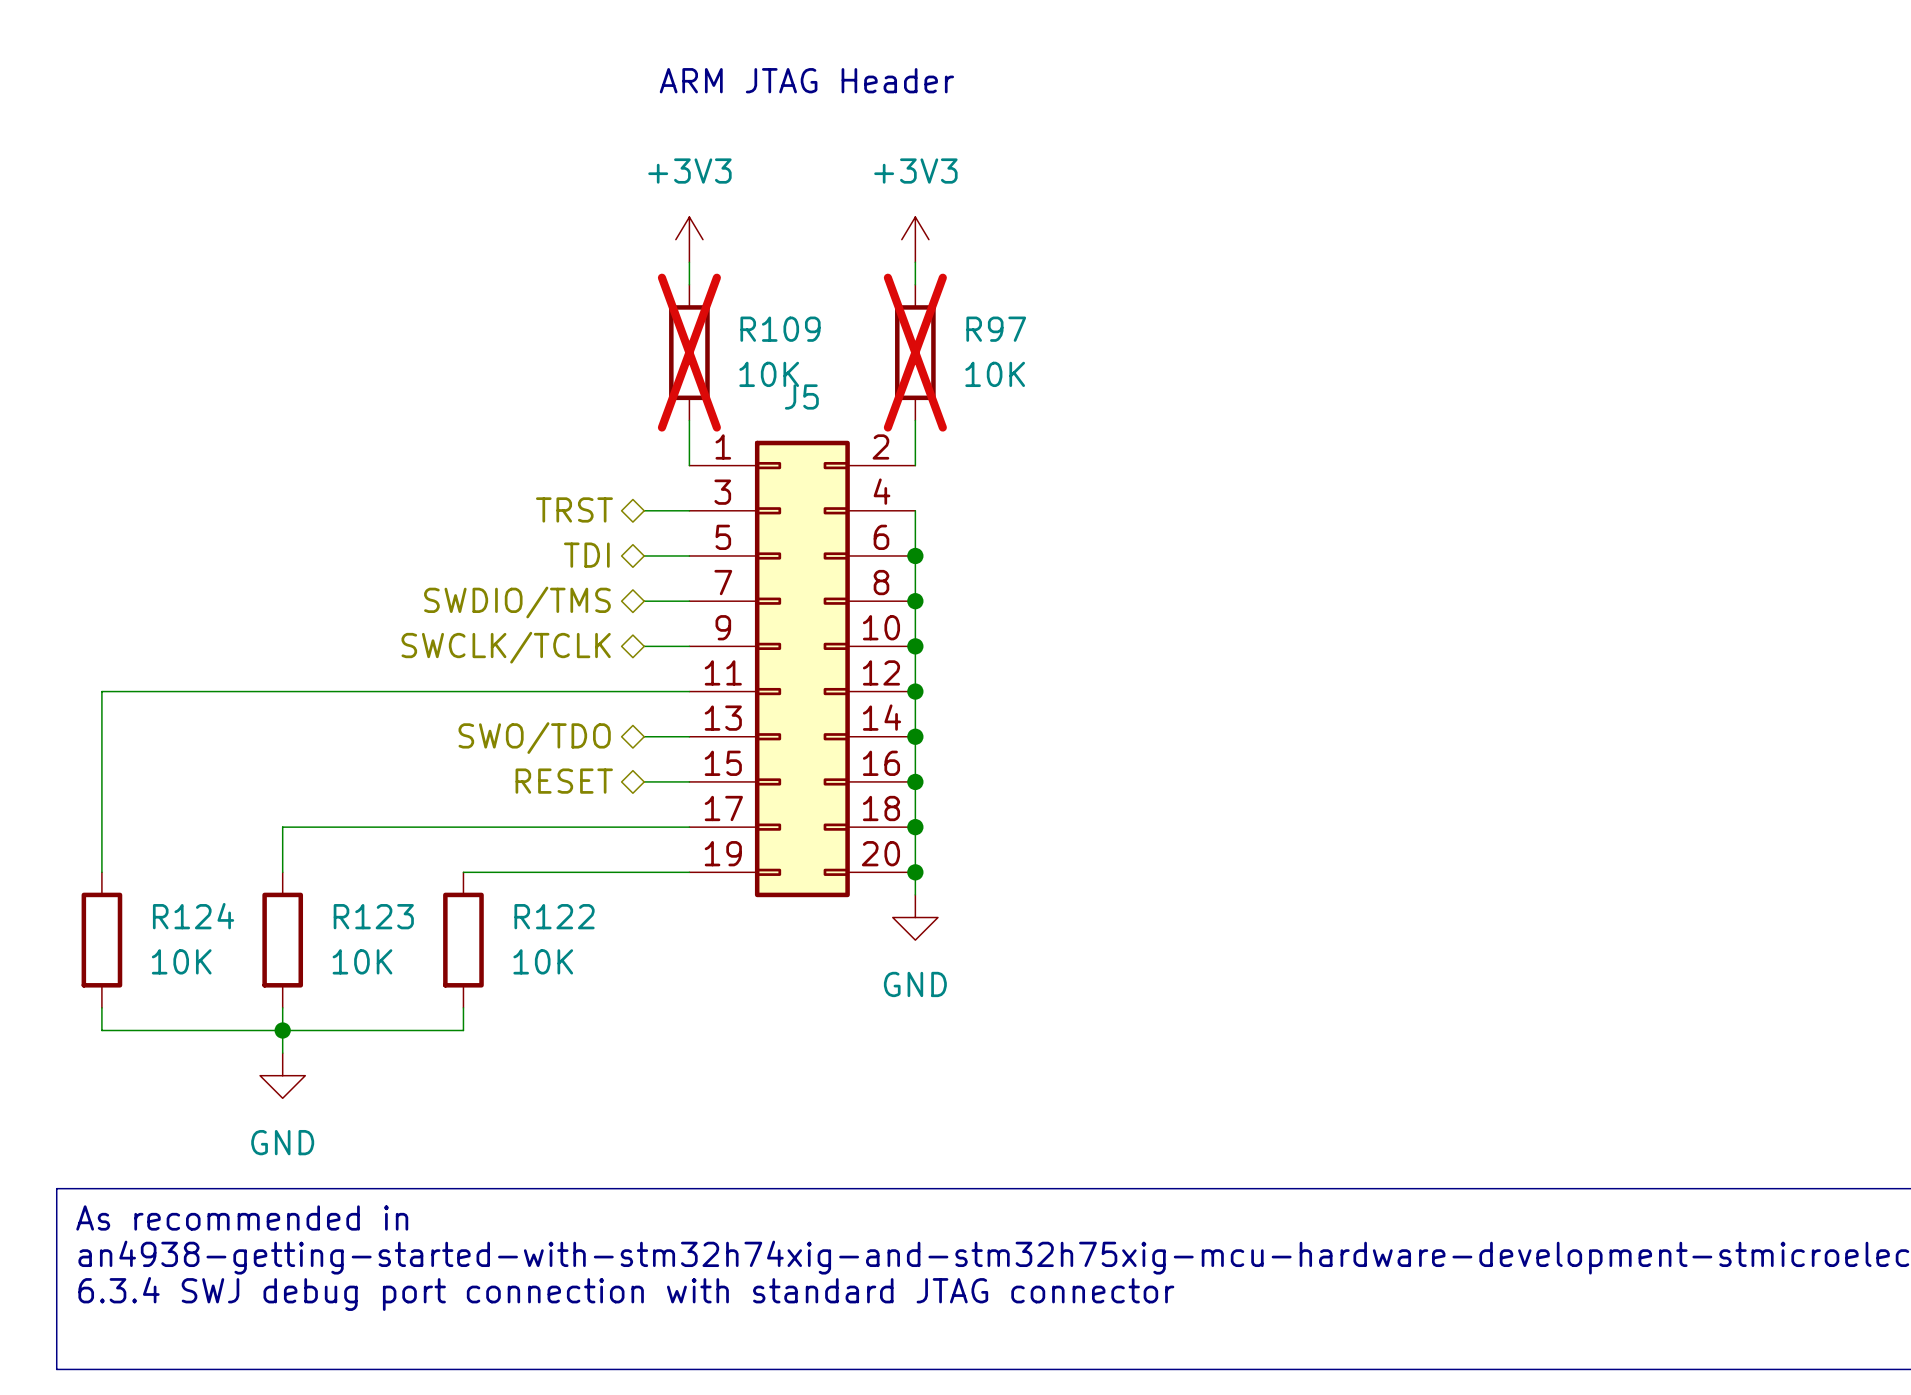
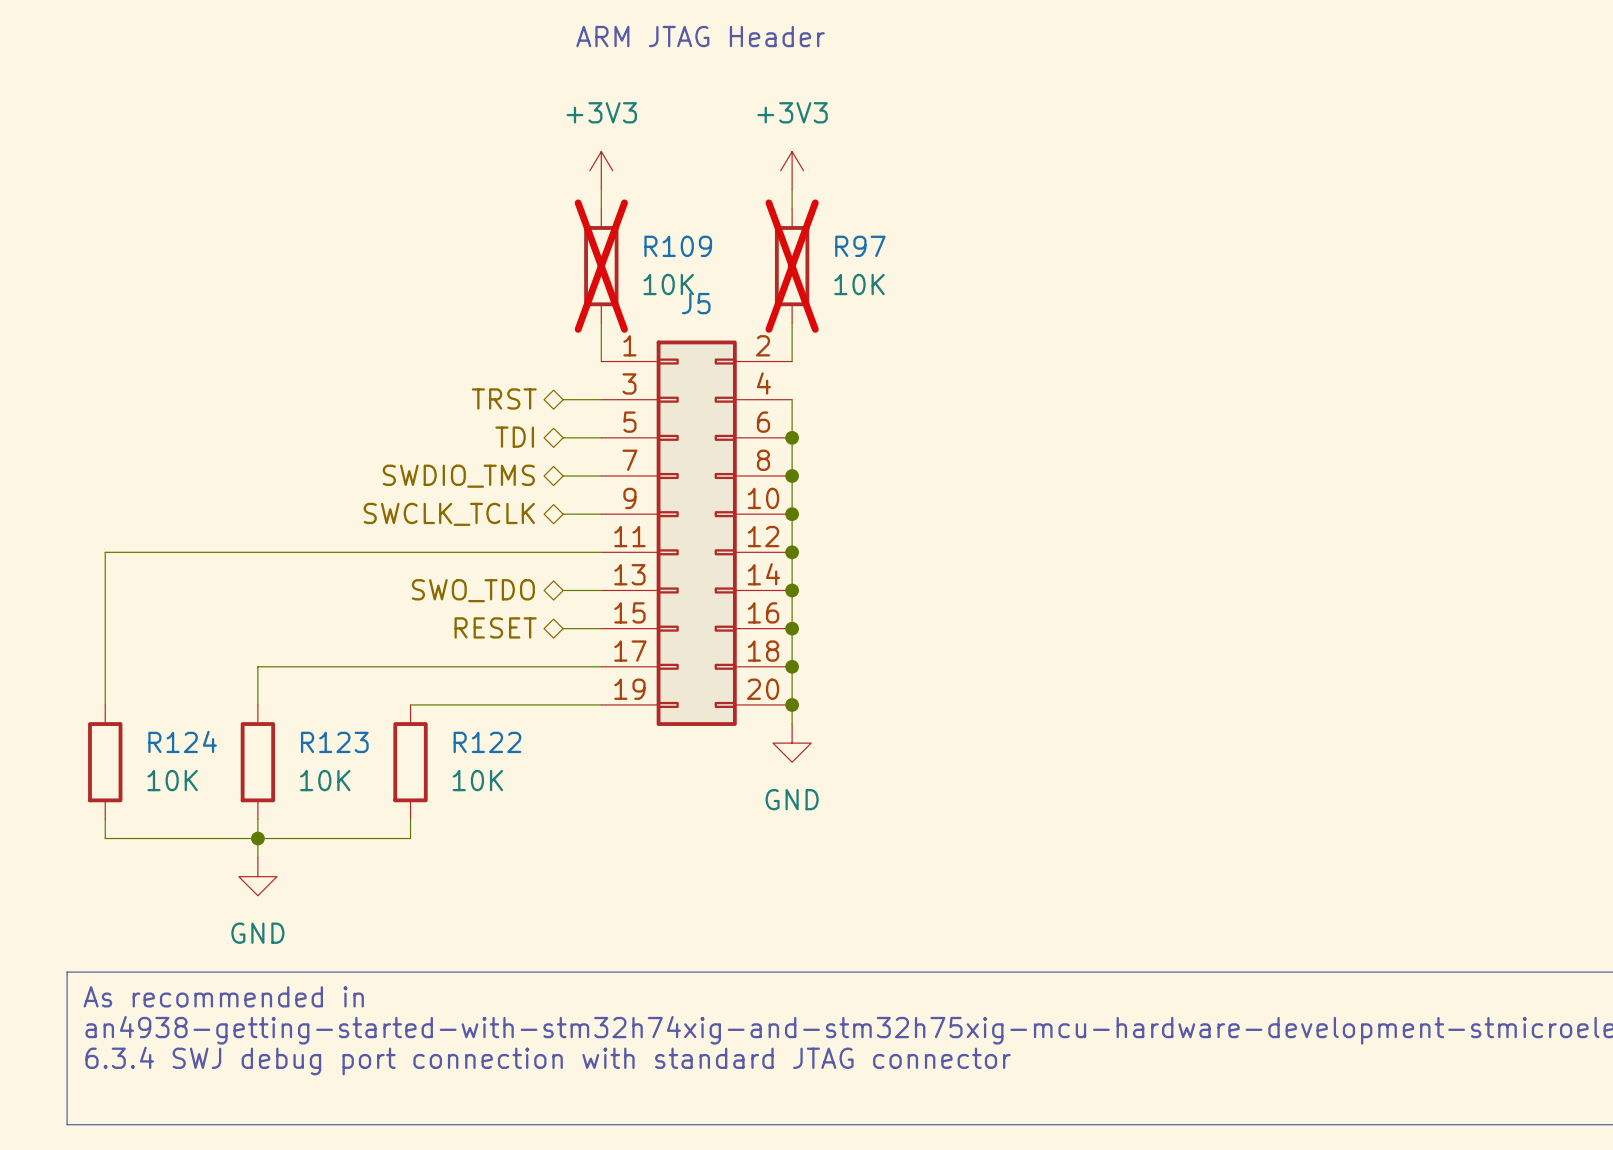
hierarchical label: SWDIO/TMS (517, 602) -> SWDIO_TMS (458, 476)
hierarchical label: SWCLK/TCLK (506, 647) -> SWCLK_TCLK (449, 514)
hierarchical label: SWO/TDO (534, 738) -> SWO_TDO (473, 590)

